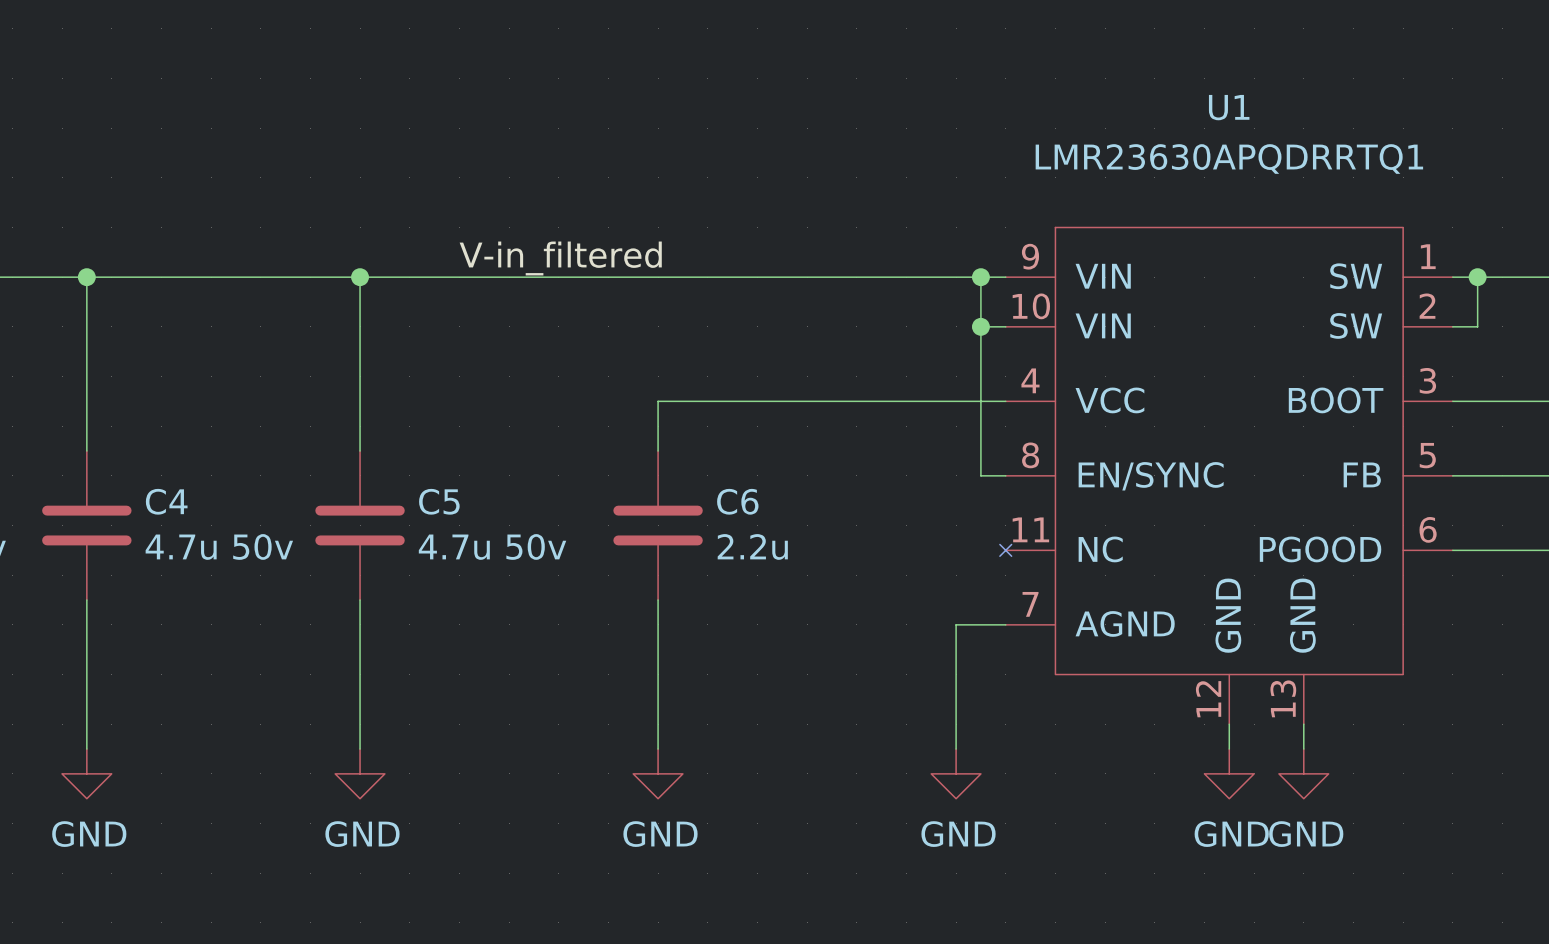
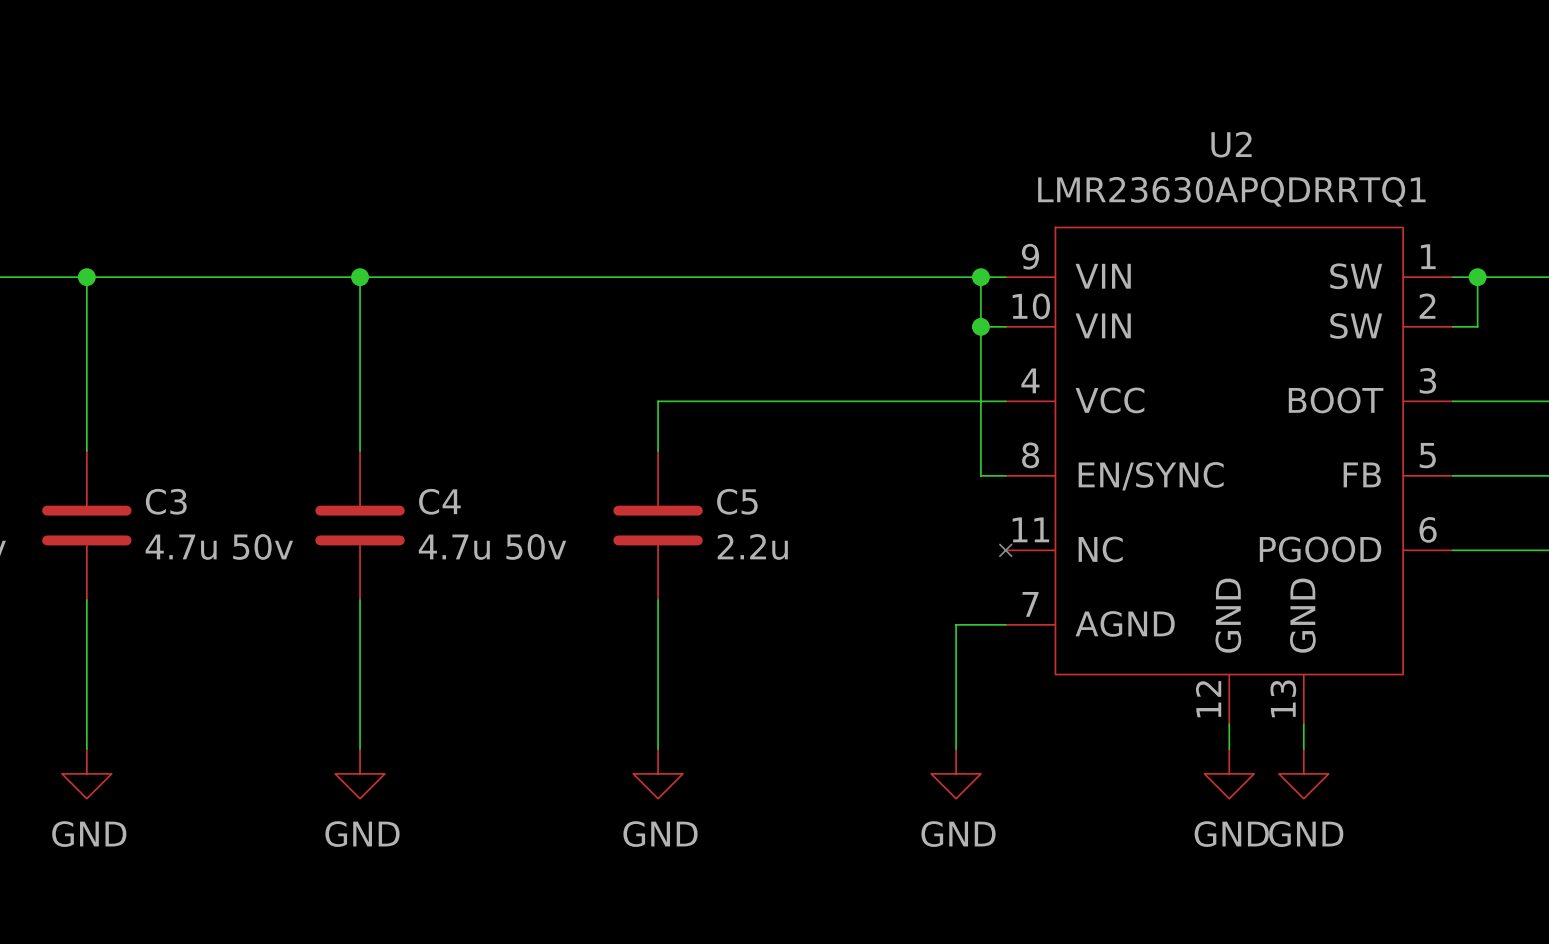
U1 name: U1 (1229, 107) -> U2 (1231, 144)
U1 value position: LMR23630APQDRRTQ1 (1229, 159) -> LMR23630APQDRRTQ1 (1231, 191)
label: V-in_filtered (560, 258) -> none
C4 name: C4 (166, 501) -> C3 (166, 501)
C5 name: C5 (439, 501) -> C4 (439, 501)
C6 name: C6 (737, 501) -> C5 (737, 501)

